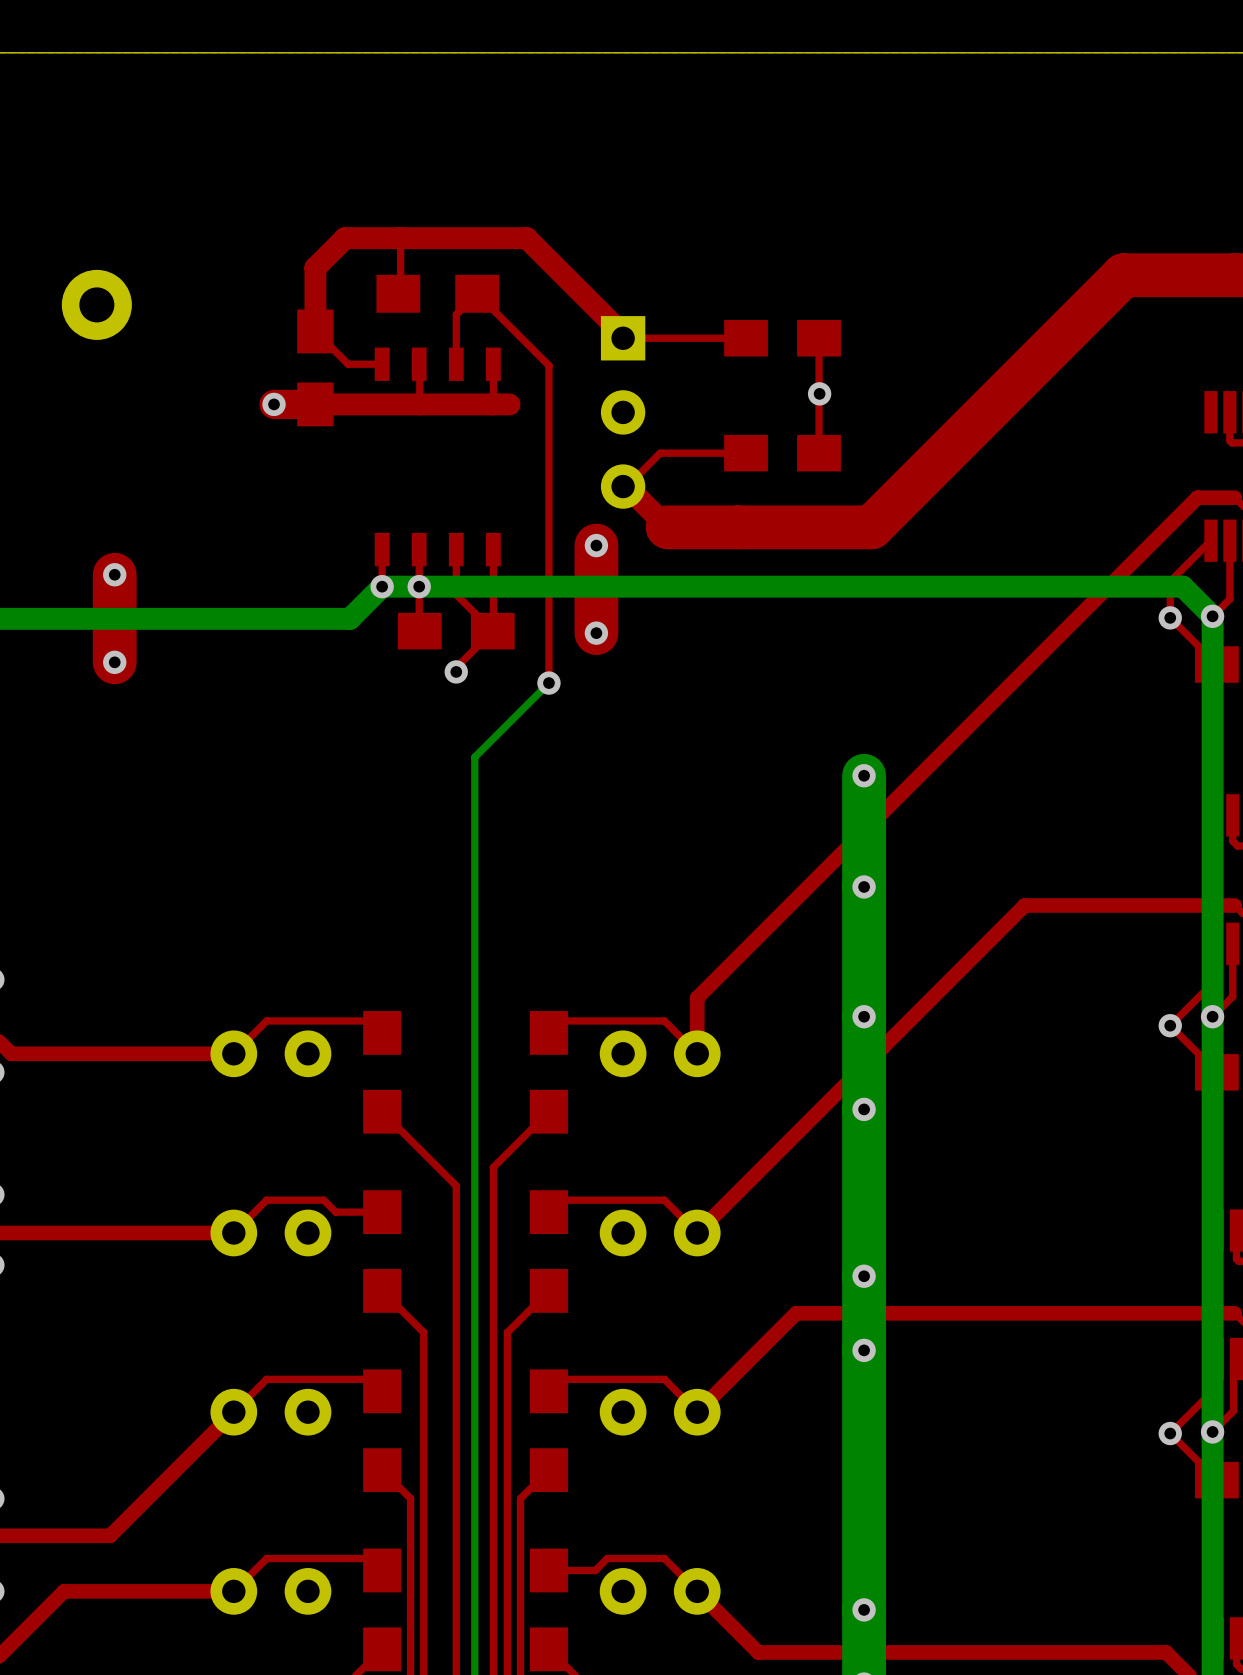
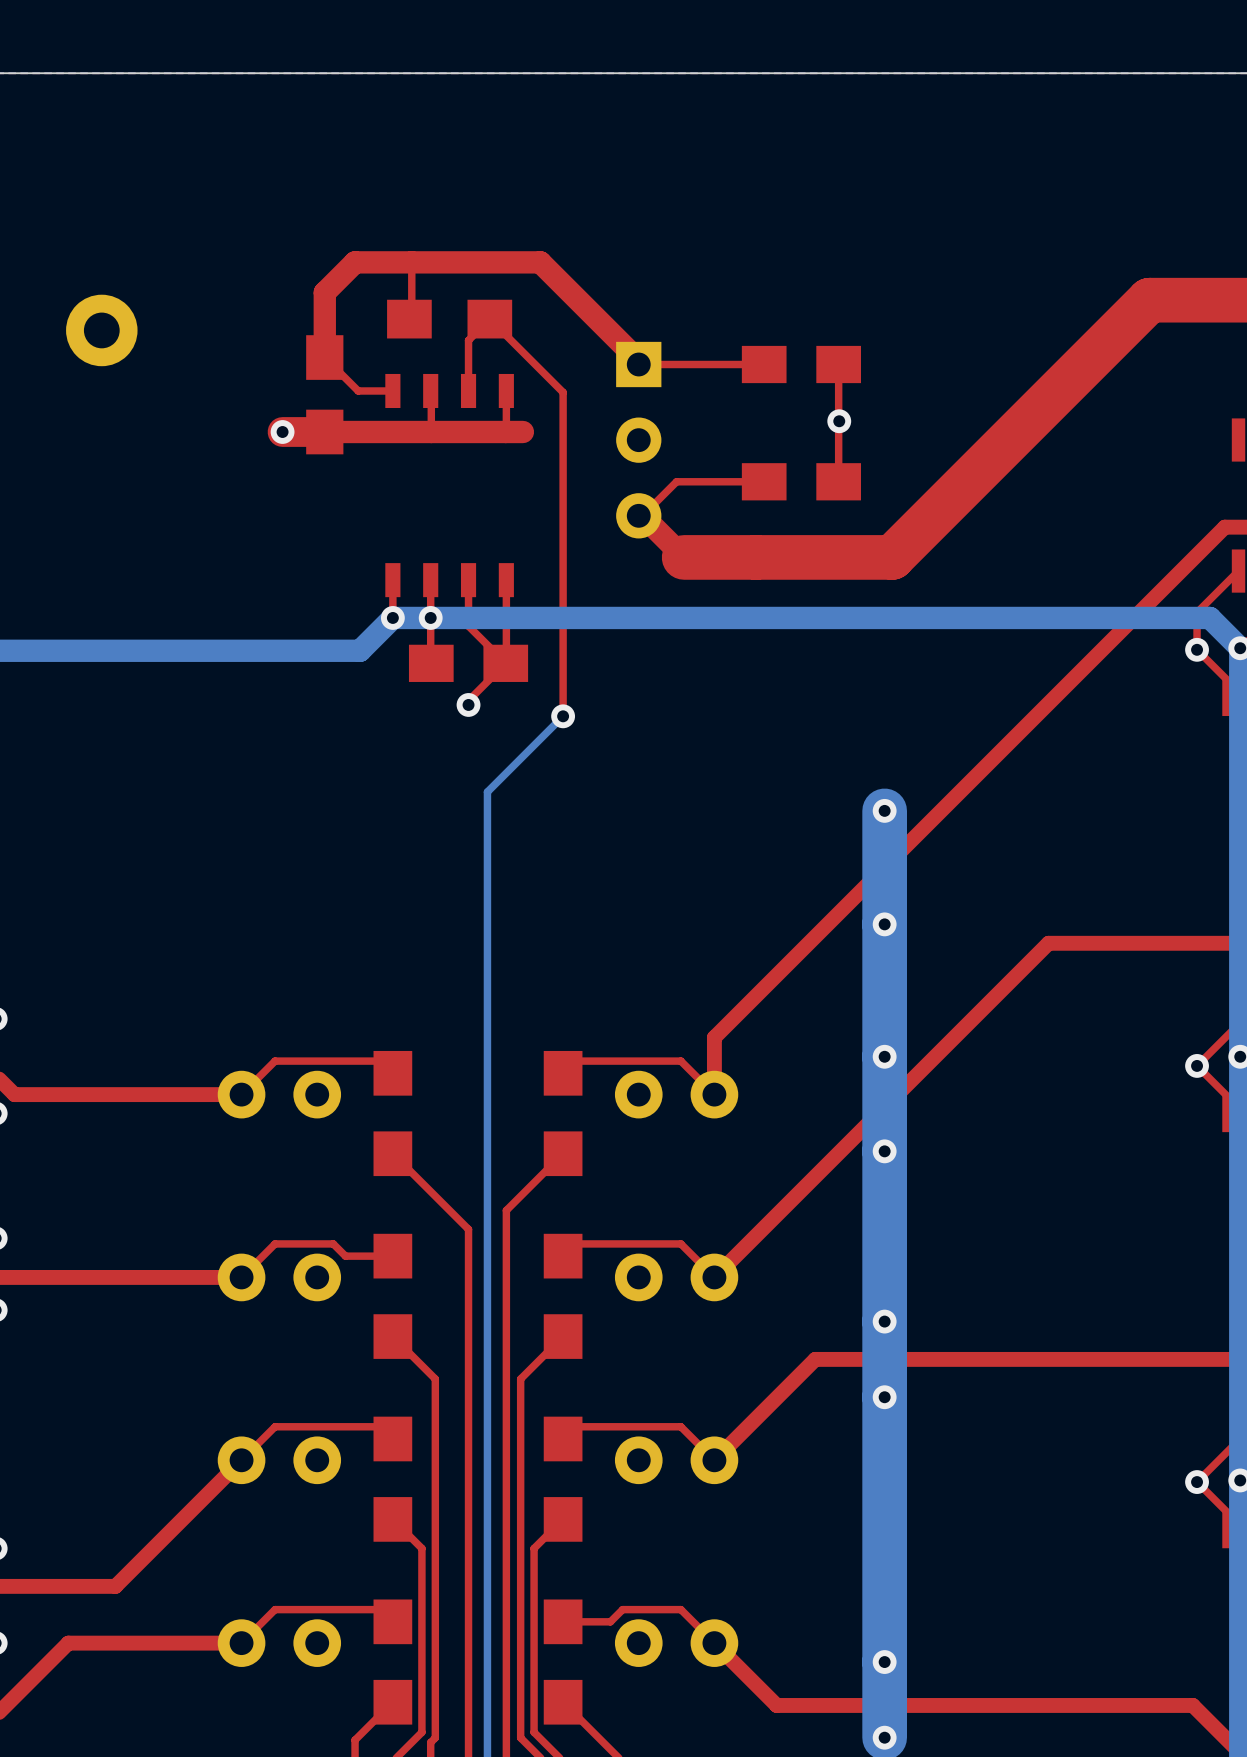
top track: (596, 545) (596, 633) -> none
via: (596, 545) -> none
top track: (114, 574) (114, 662) -> none
via: (114, 574) -> none
via: (596, 633) -> none
via: (114, 662) -> none

